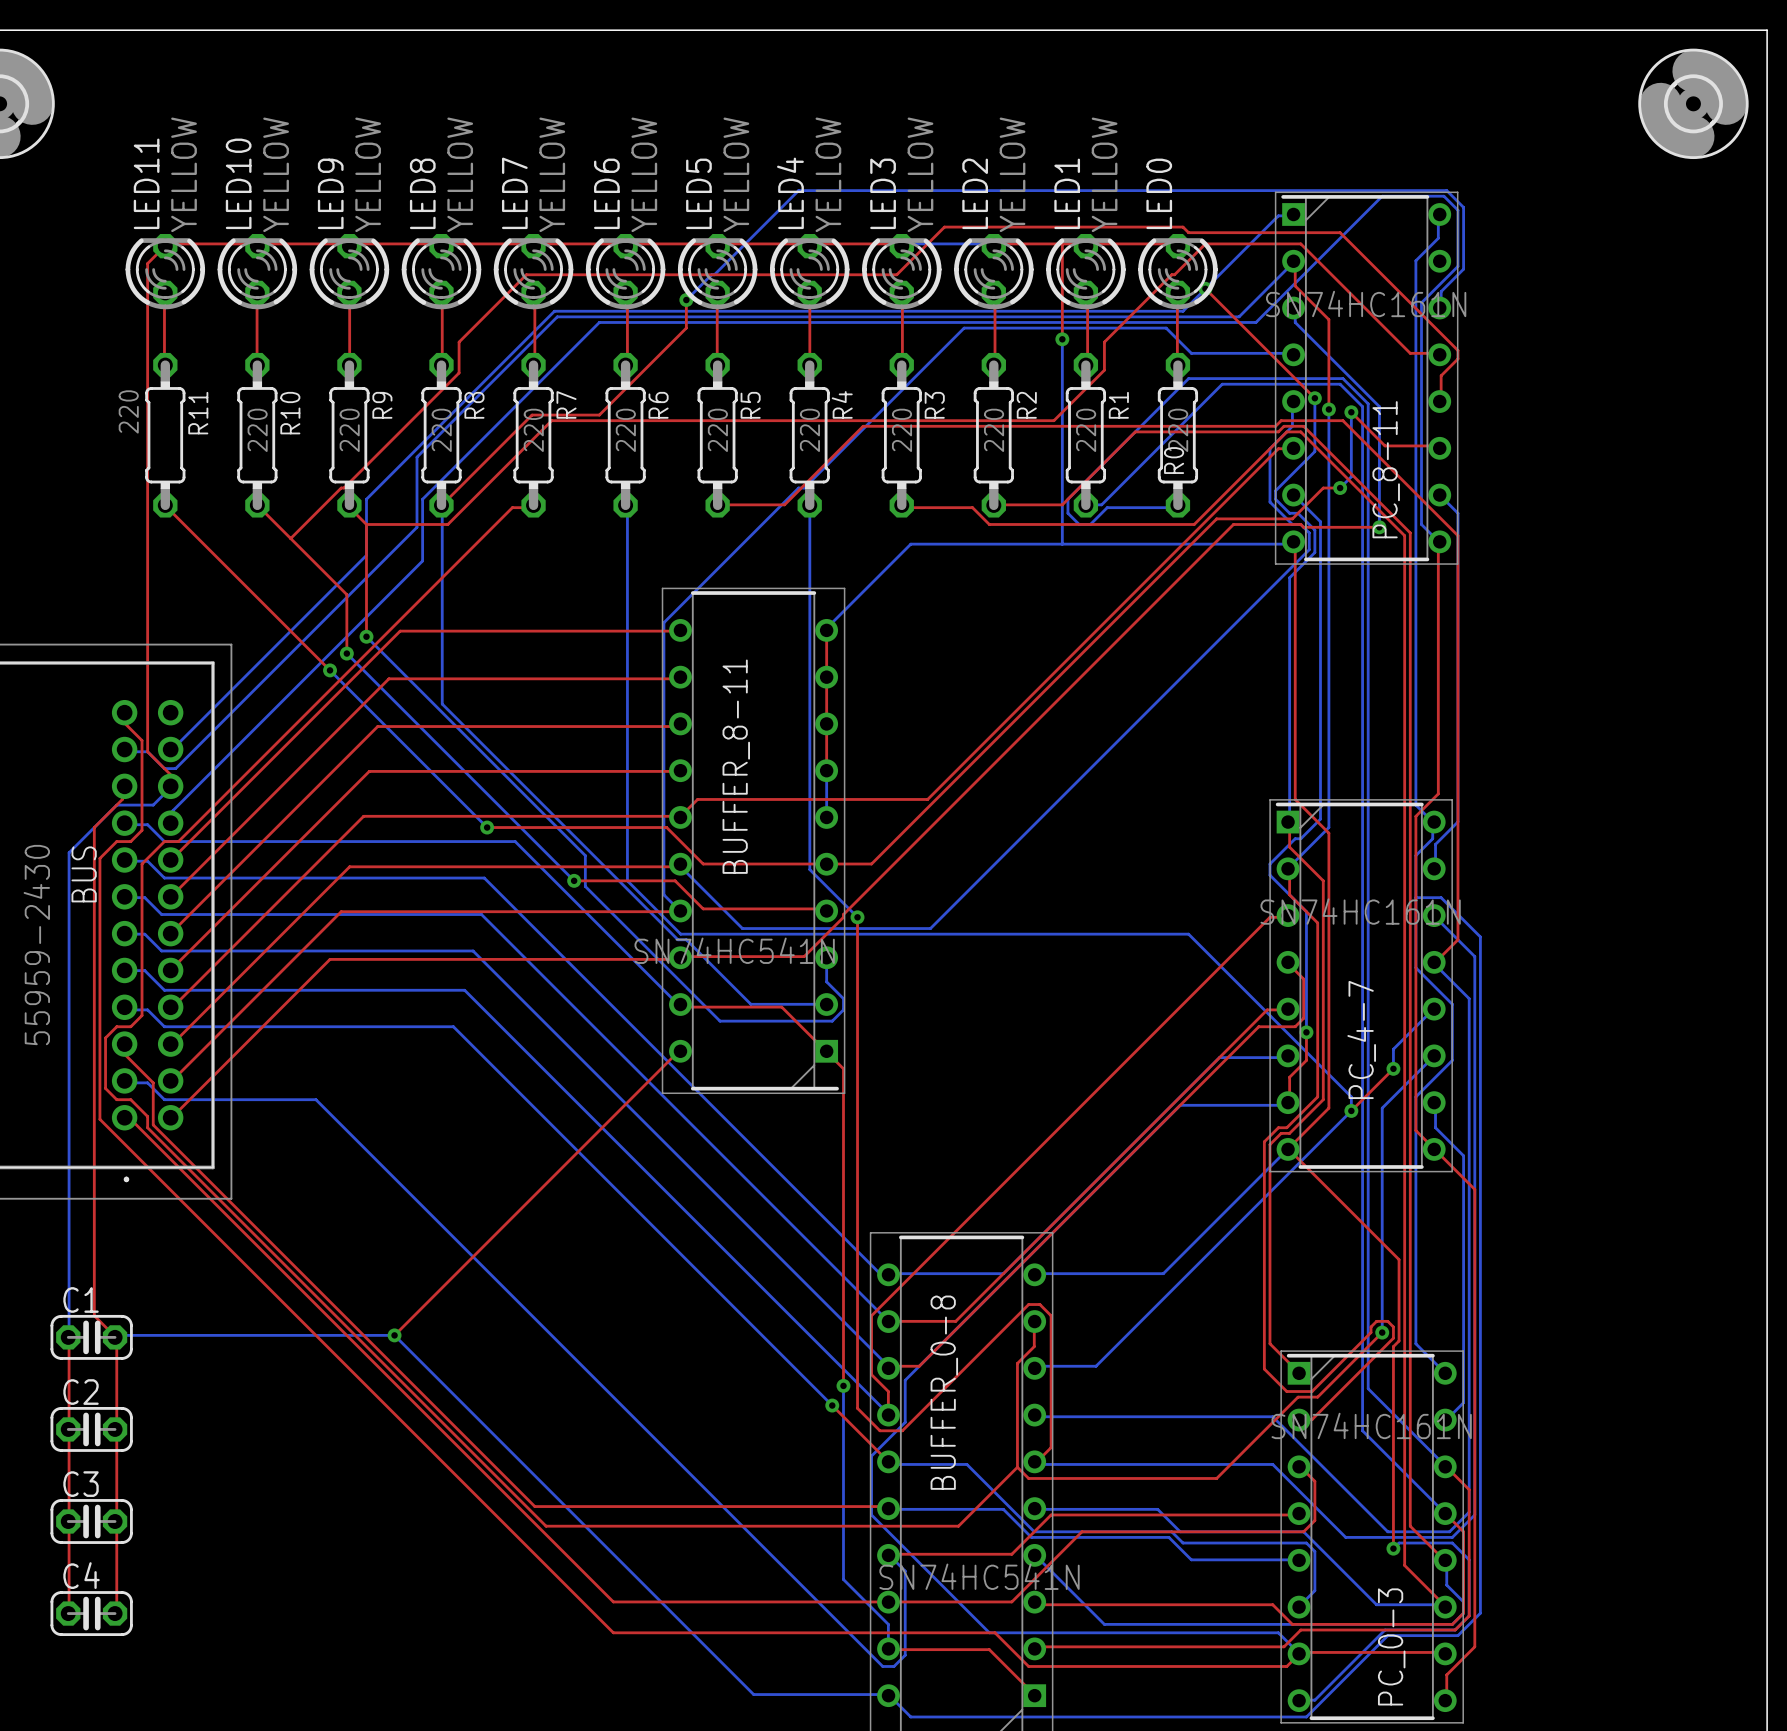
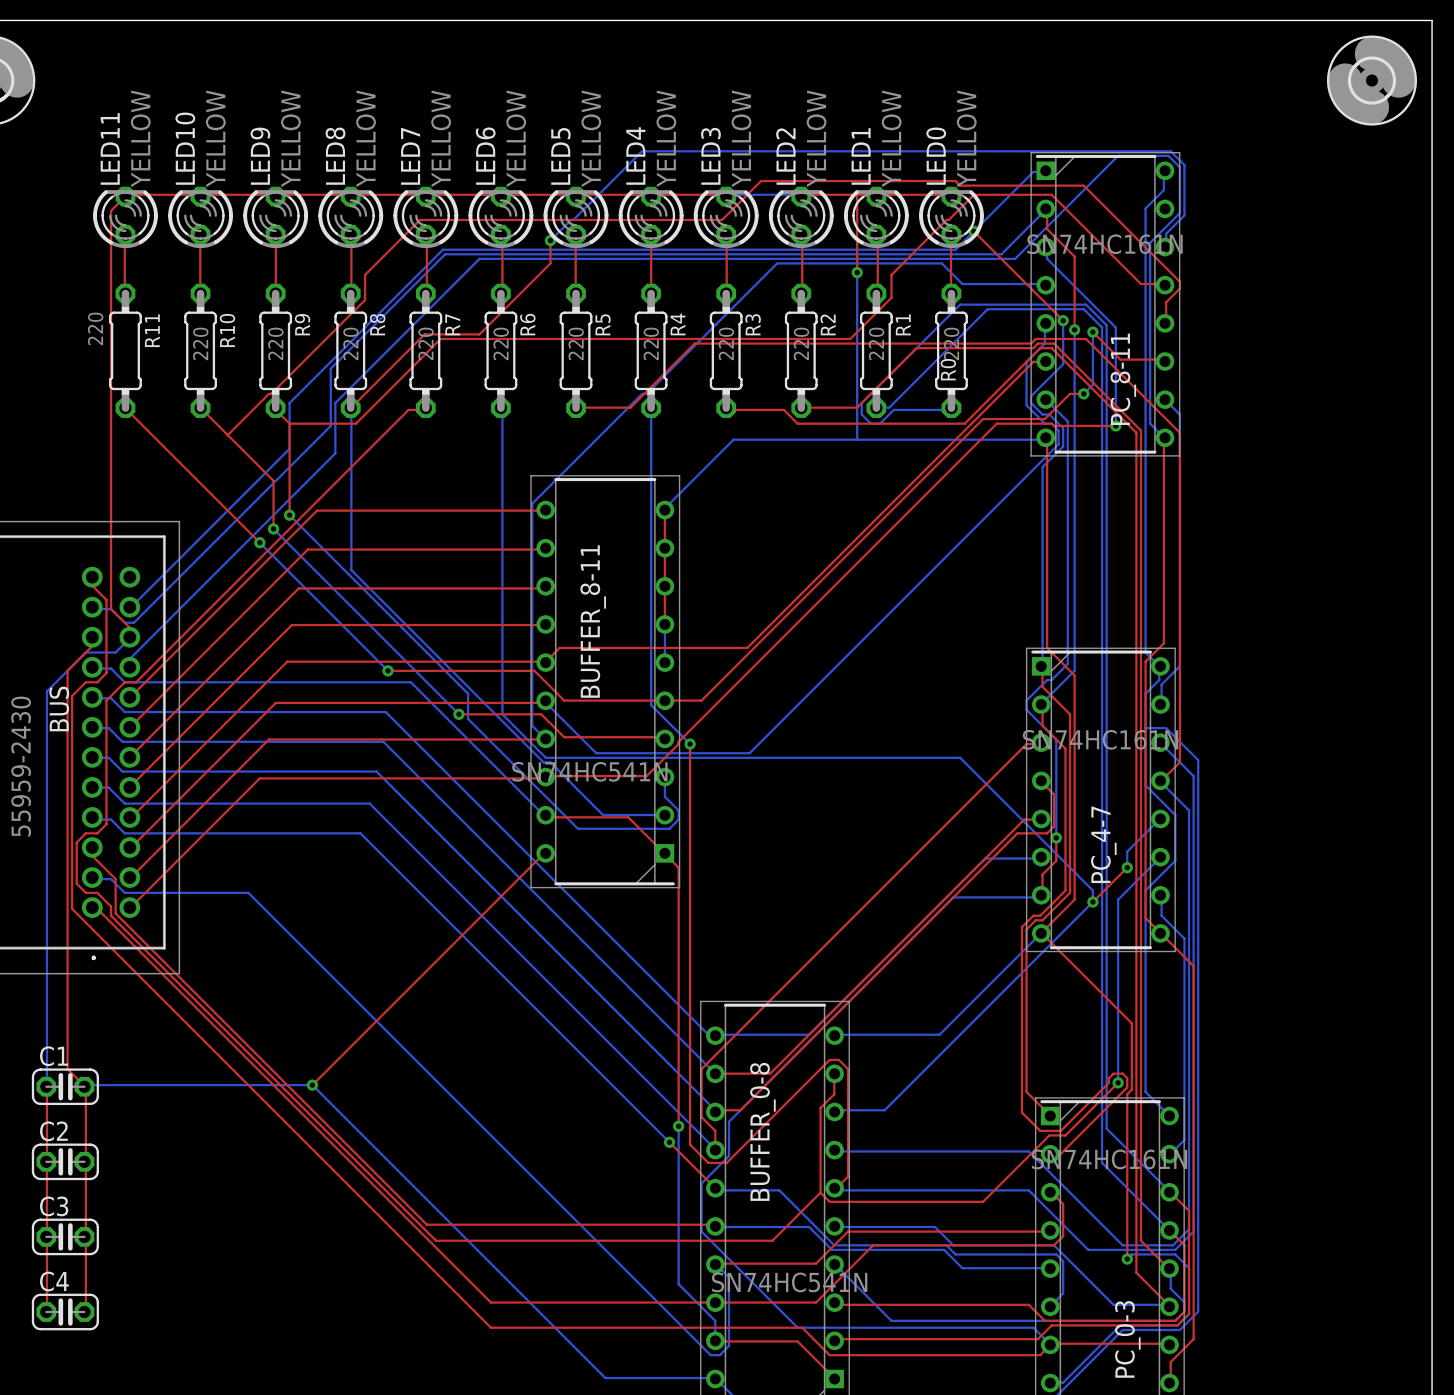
LED0 value: none -> YELLOW (966, 138)

